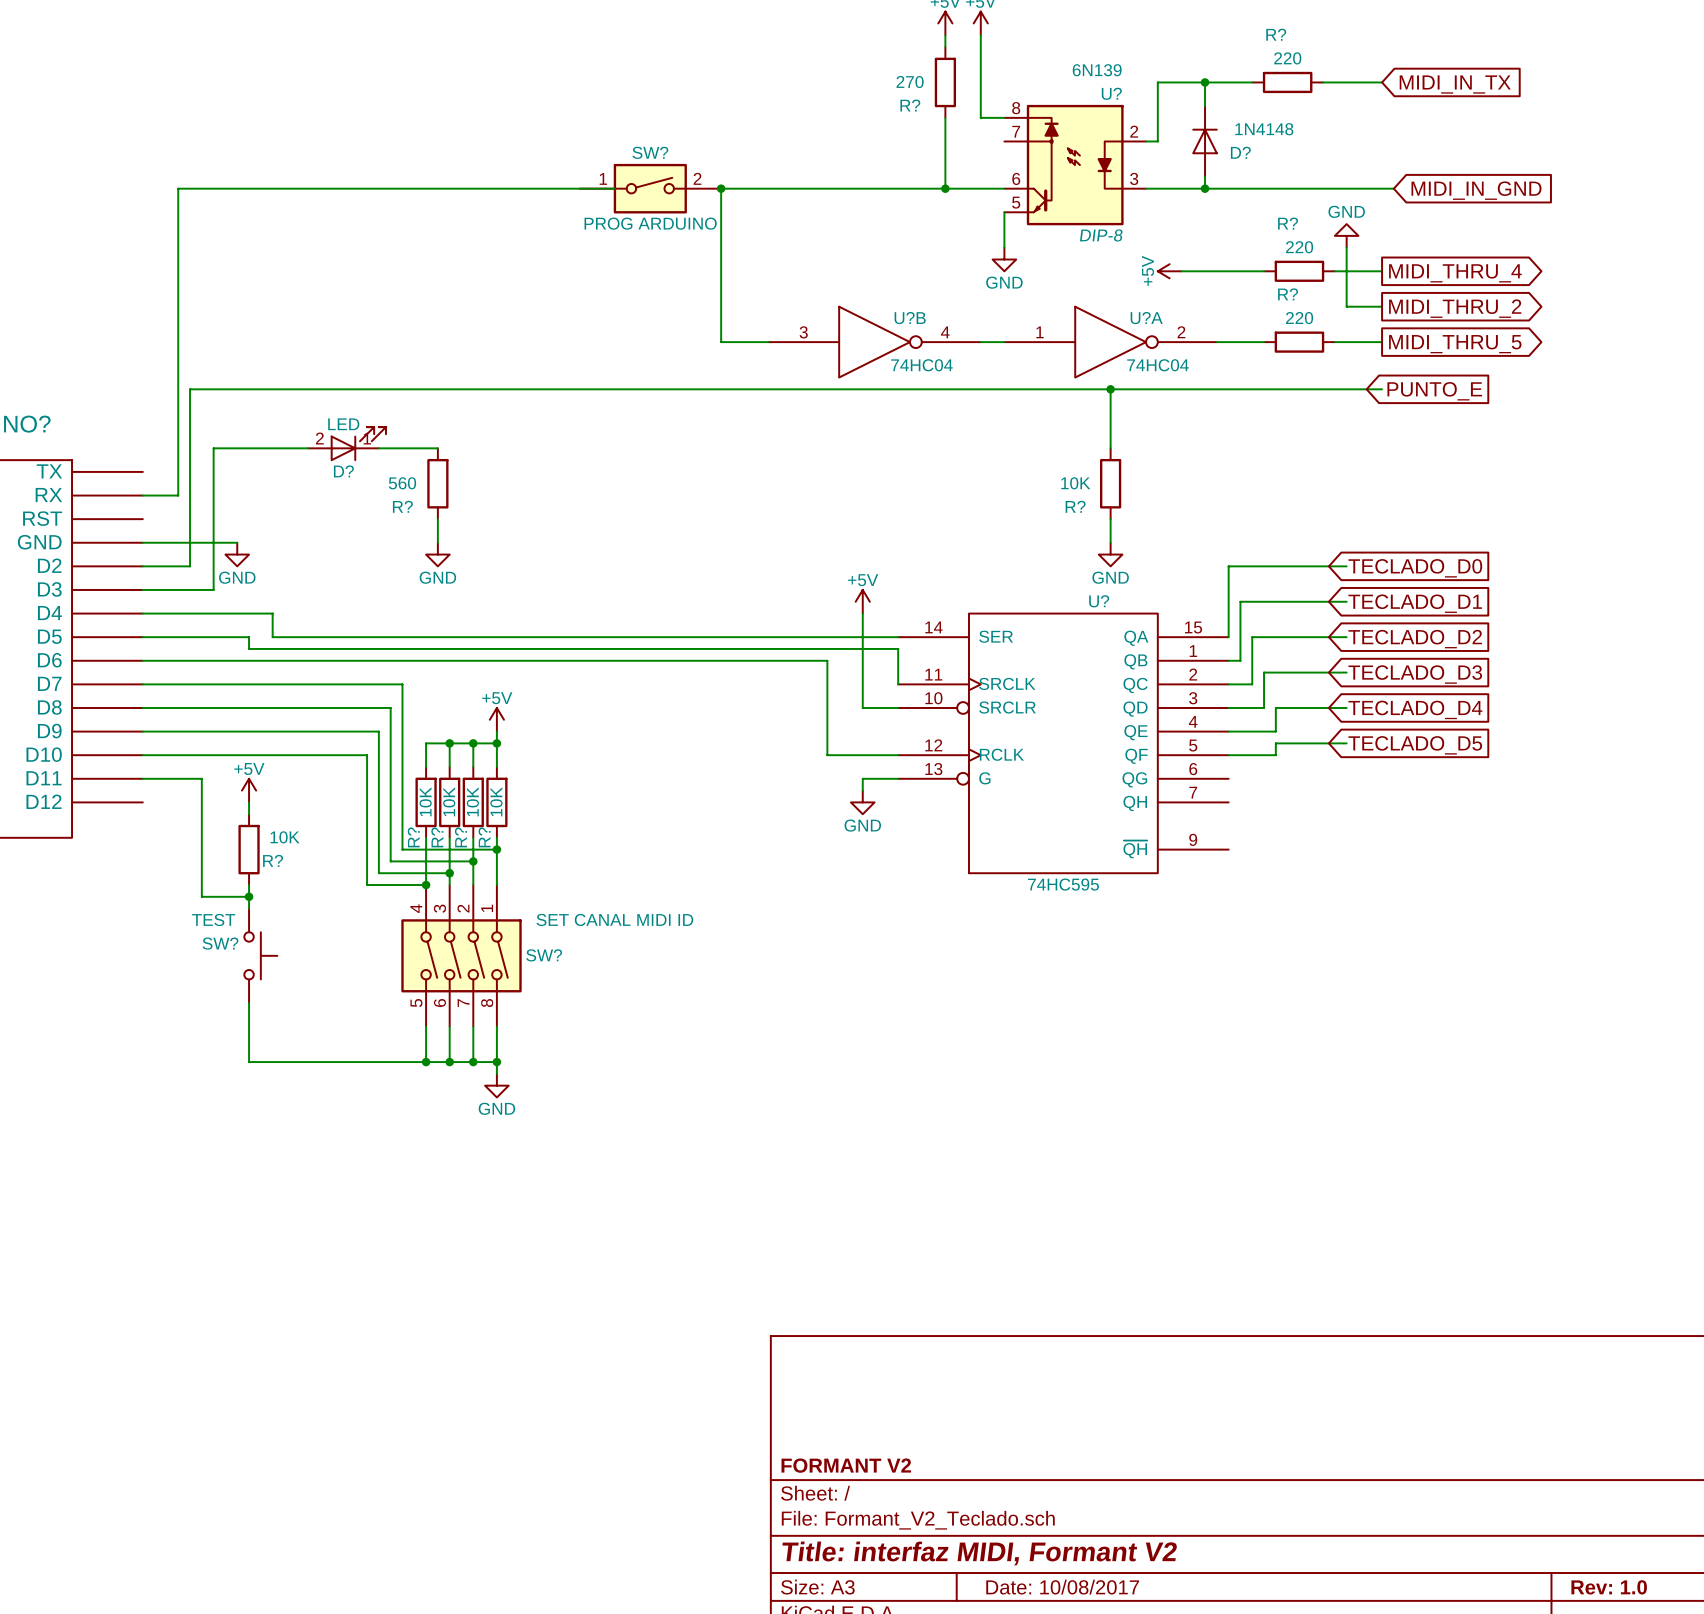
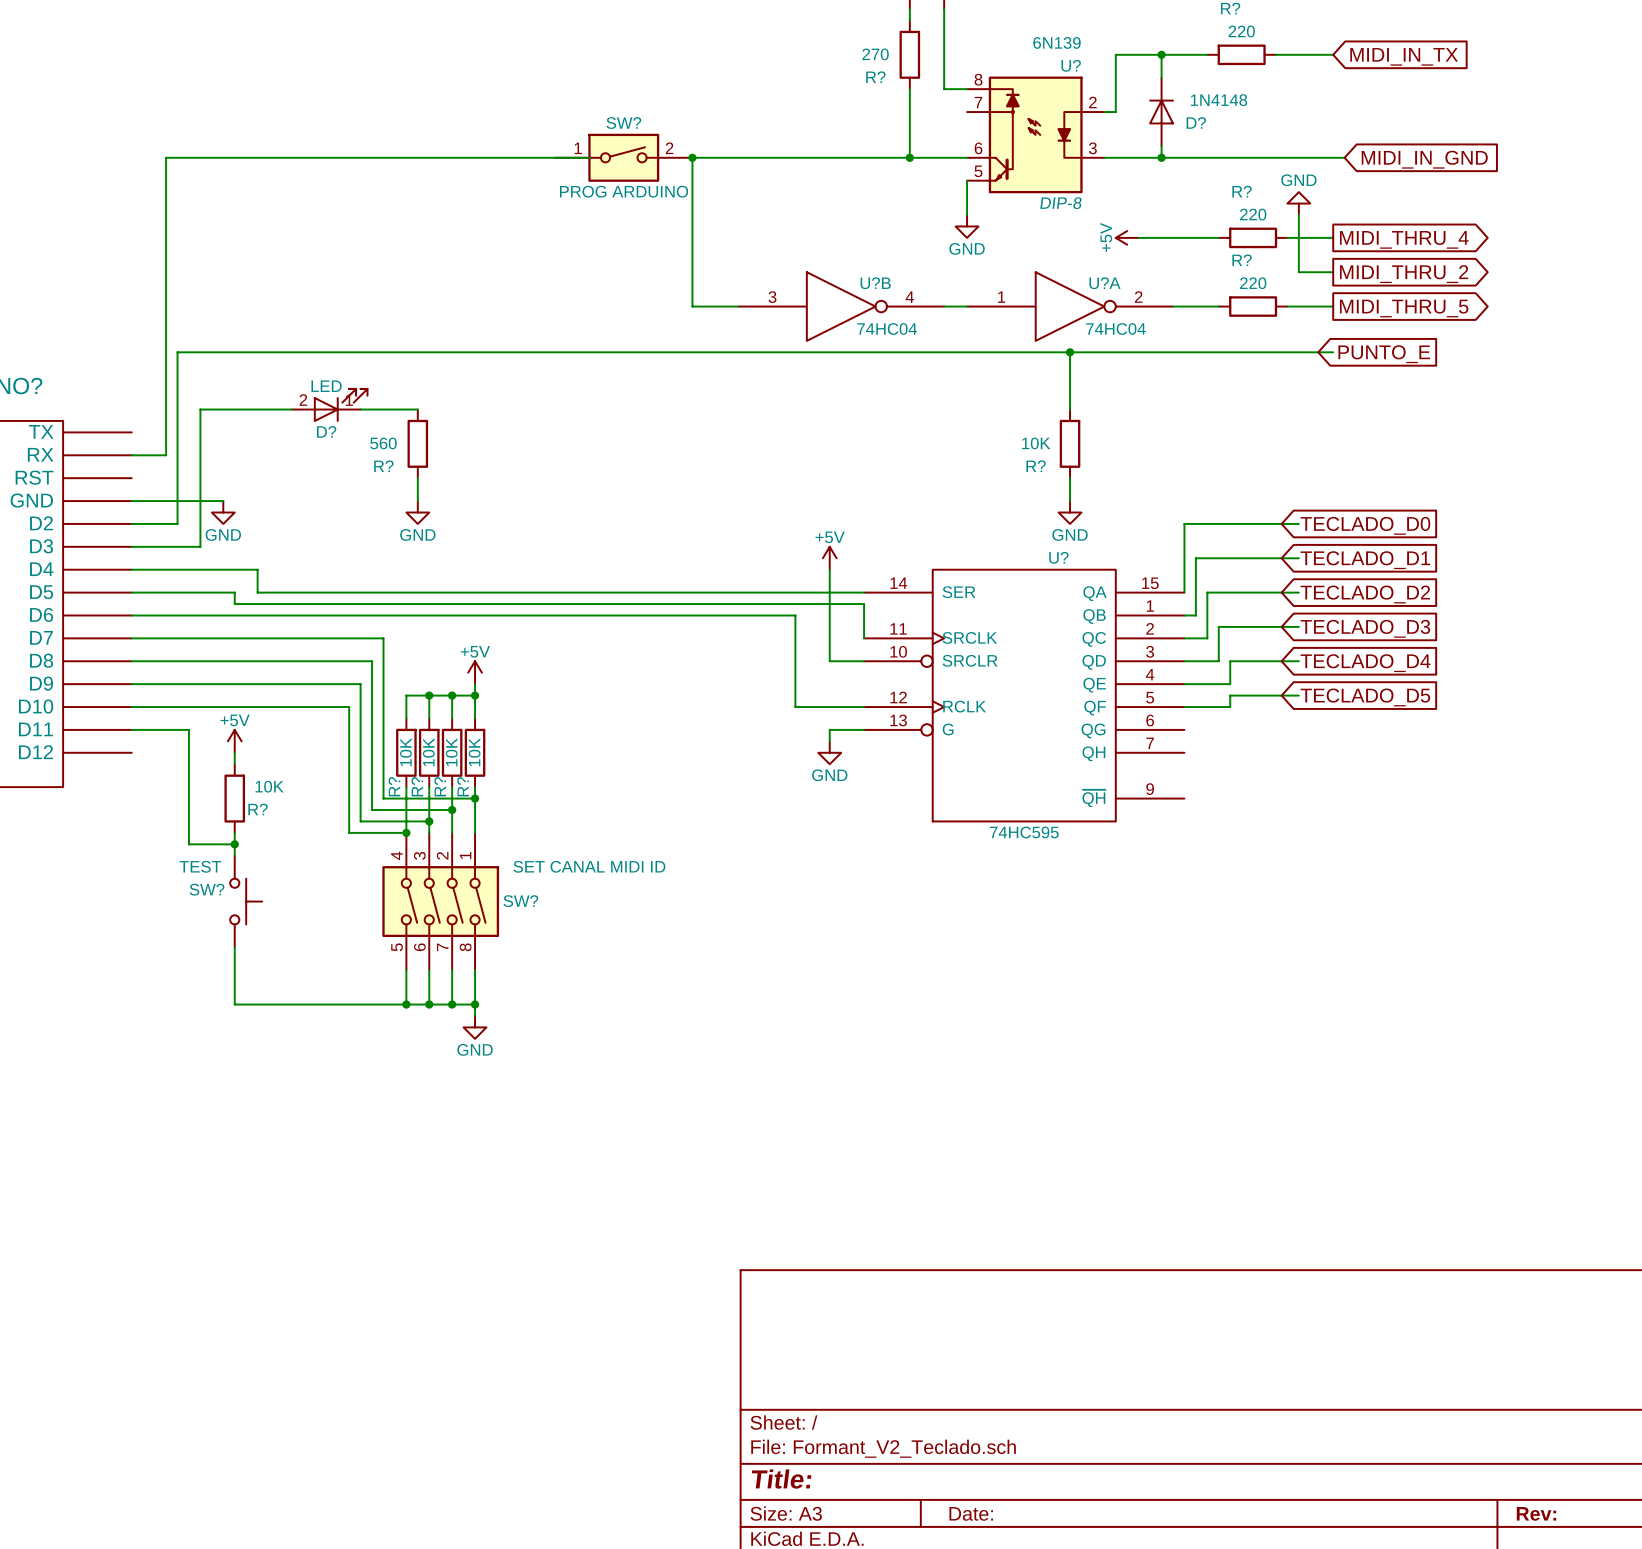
title block: FORMANT V2 (846, 1465) -> none
title block: Title: interfaz MIDI, Formant V2 (979, 1553) -> Title: (781, 1479)
title block: Date: 10/08/2017 (1062, 1587) -> Date: (971, 1513)
title block: Rev: 1.0 (1609, 1587) -> Rev: (1536, 1513)

